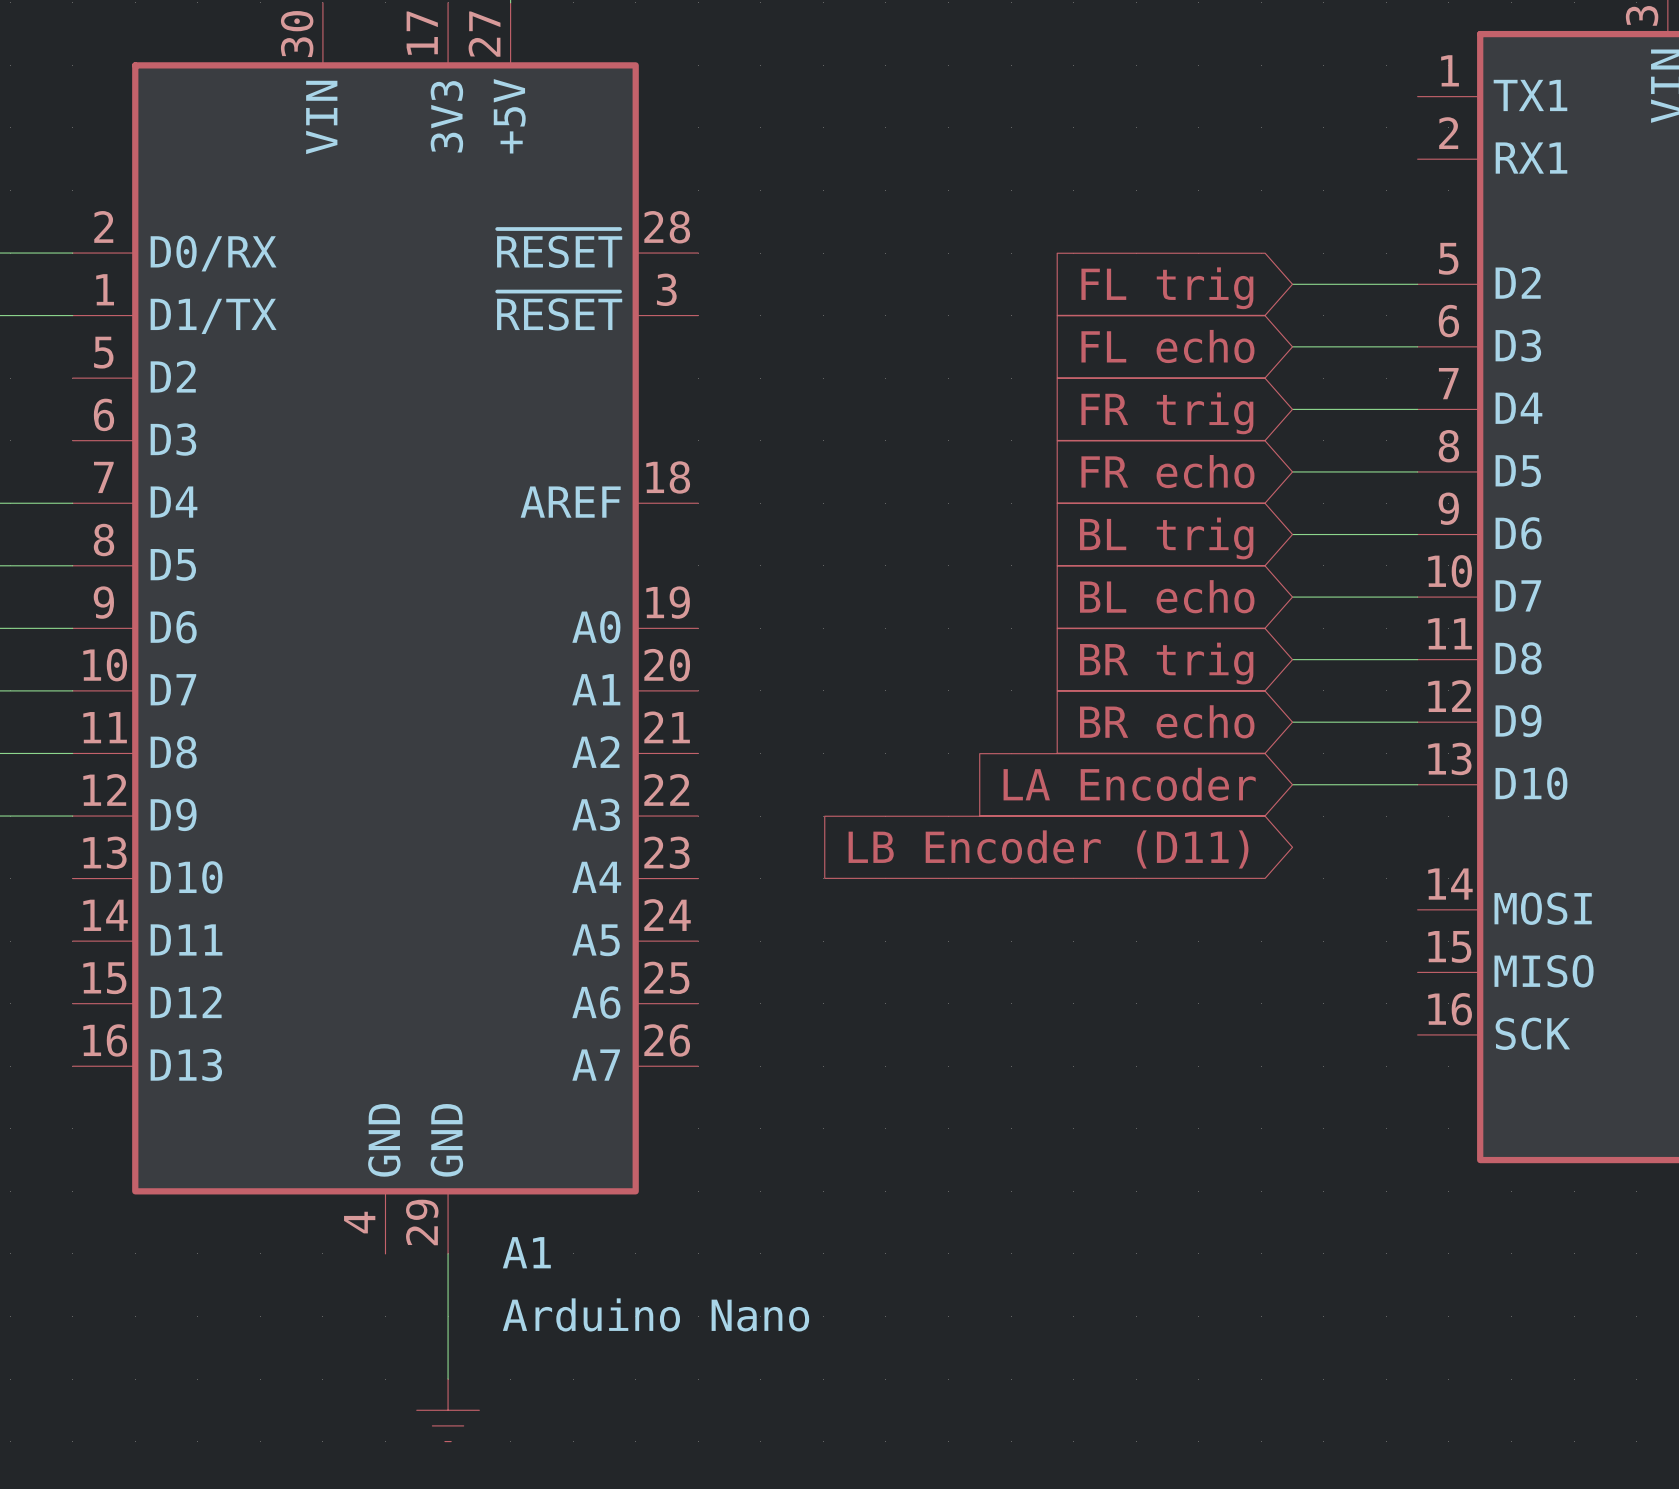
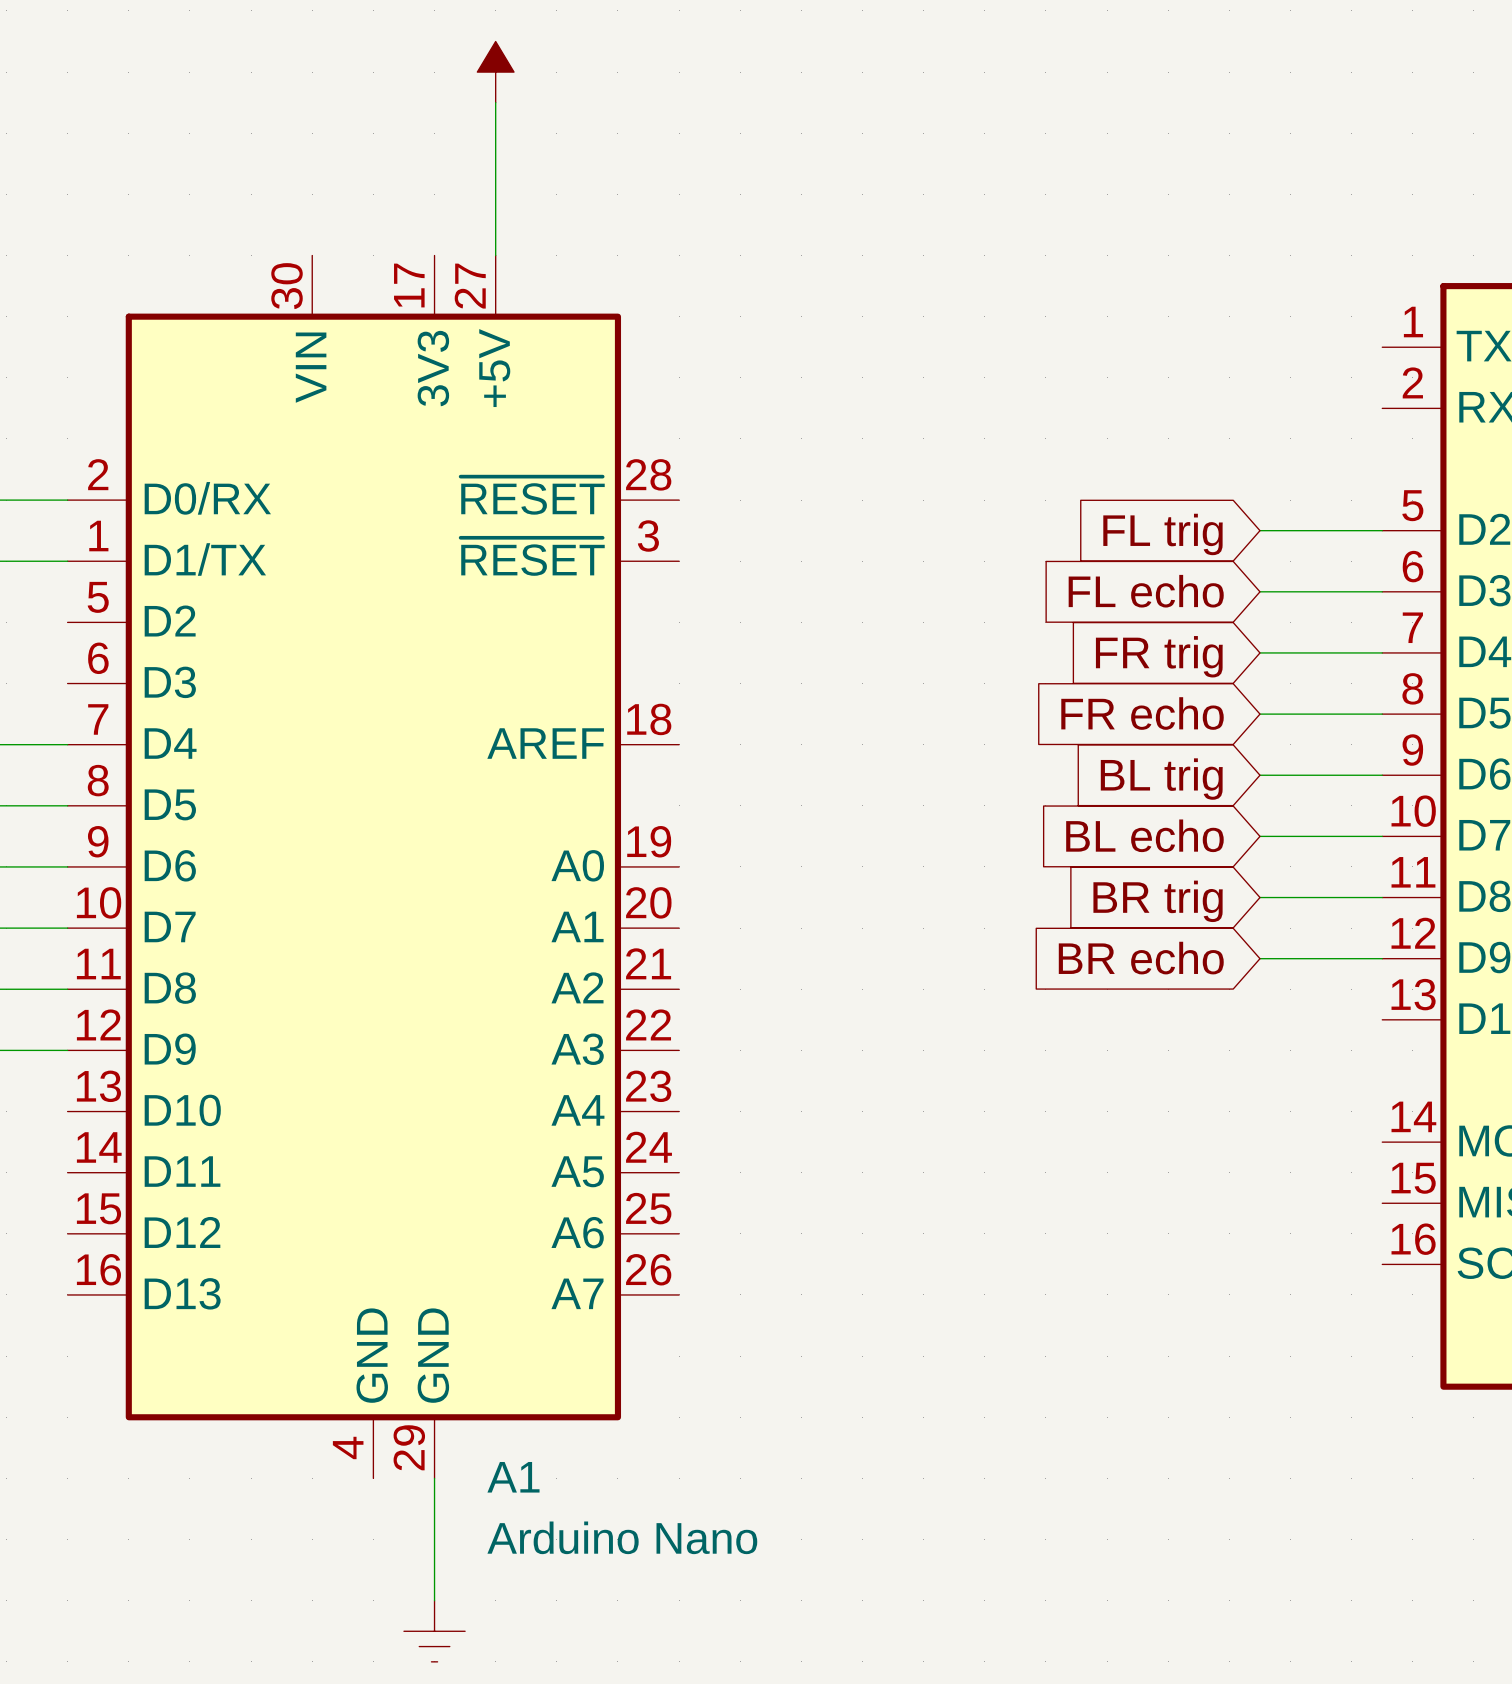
global label: LA Encoder (1129, 784) -> none
wire: (1292, 784) (1417, 784) -> none
global label: LB Encoder (D11) (1048, 849) -> none

